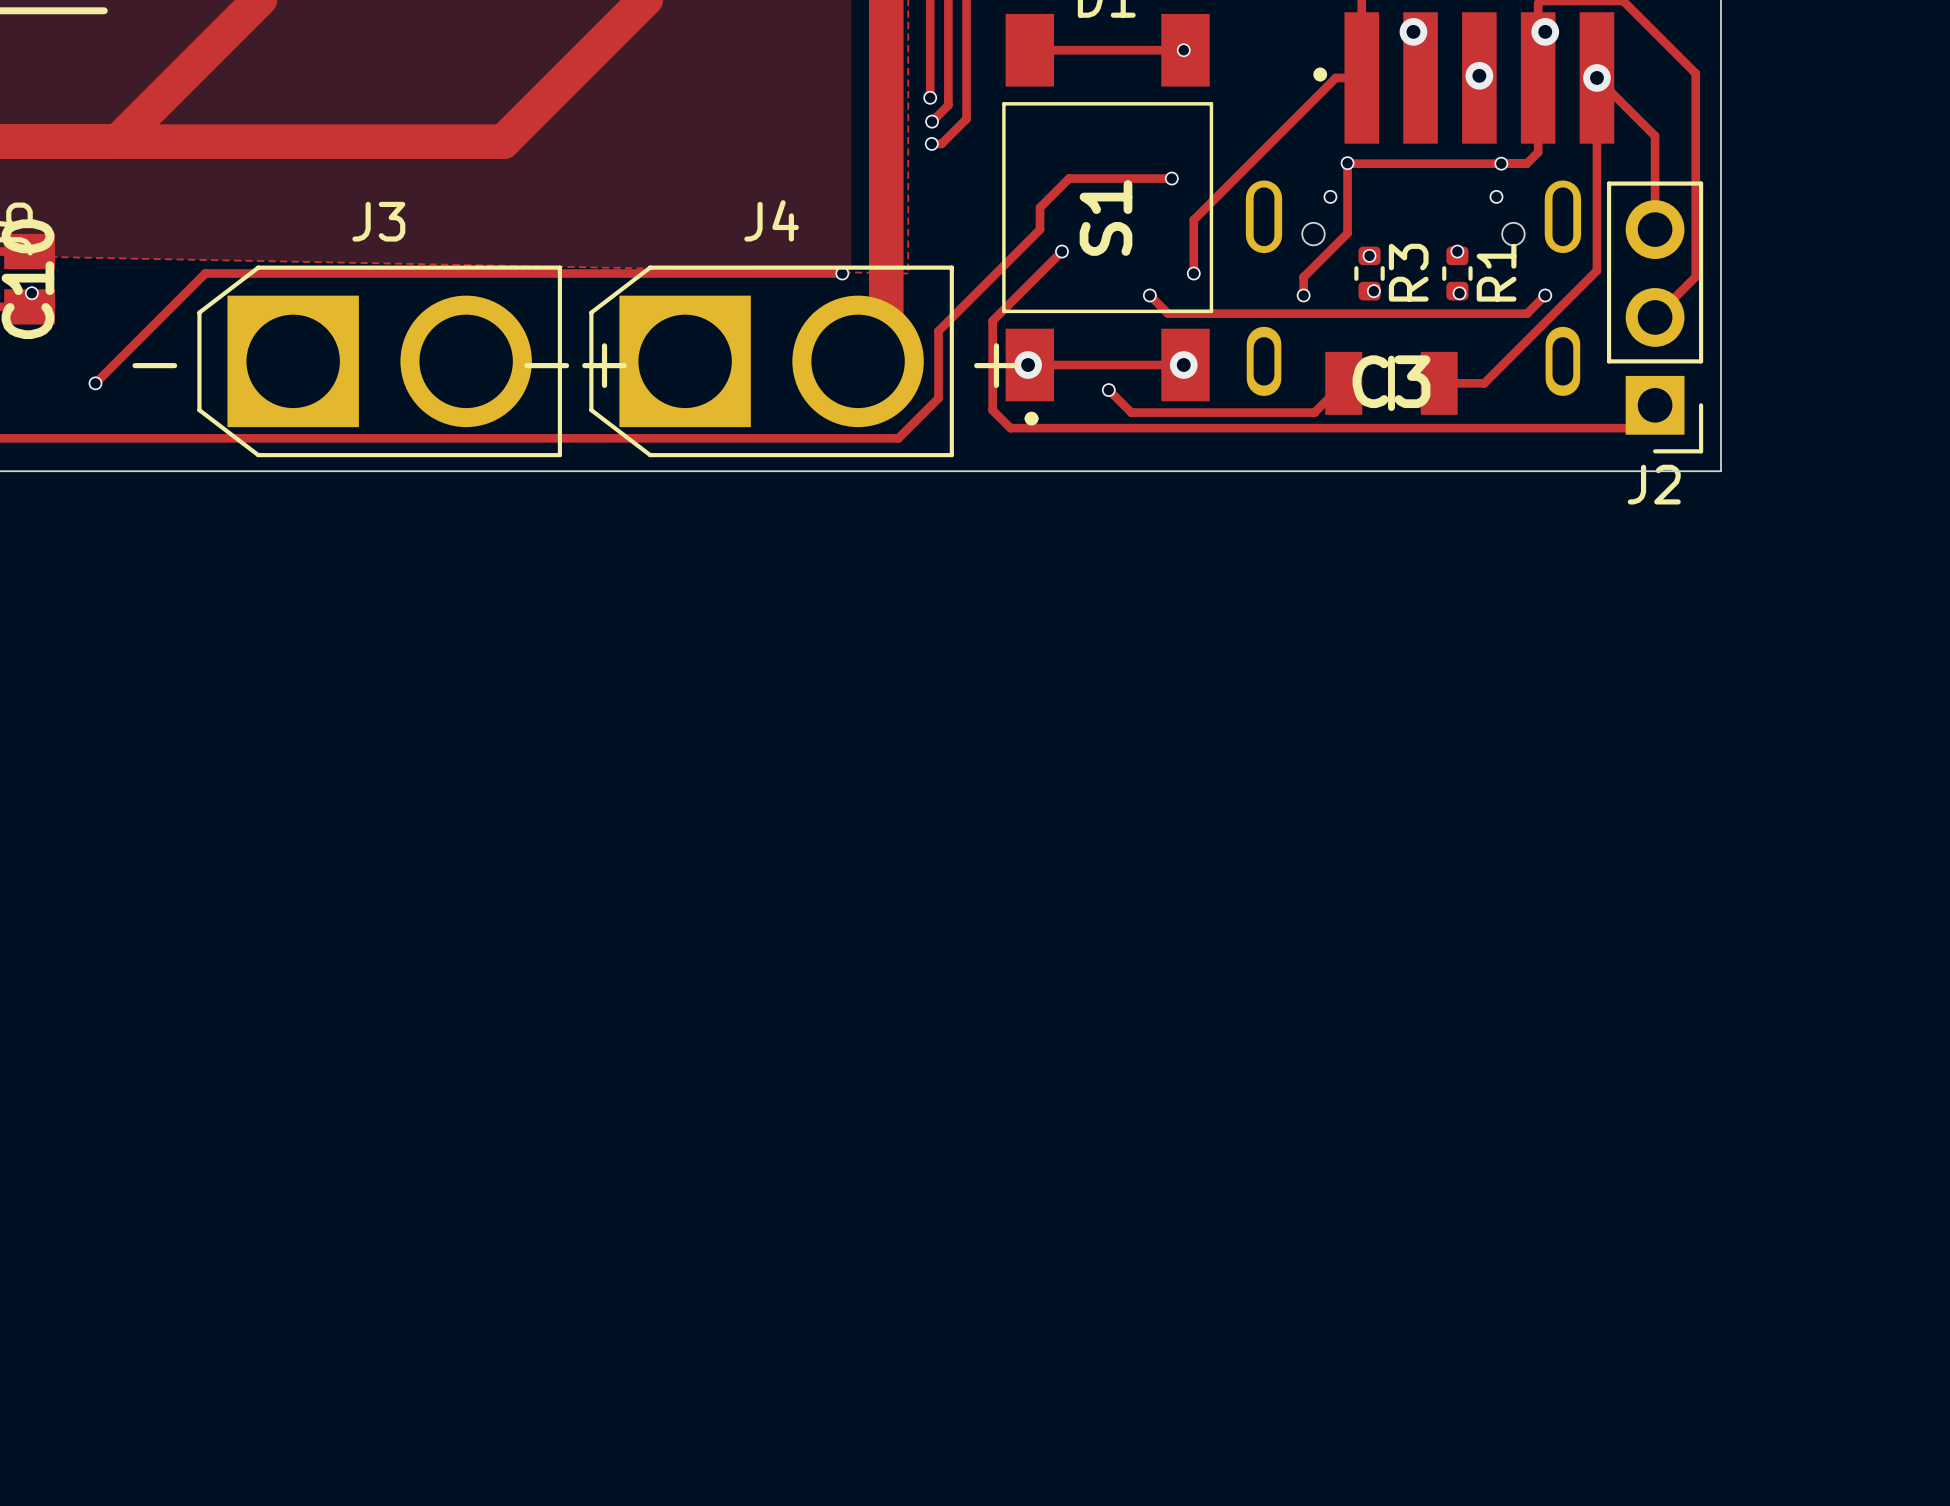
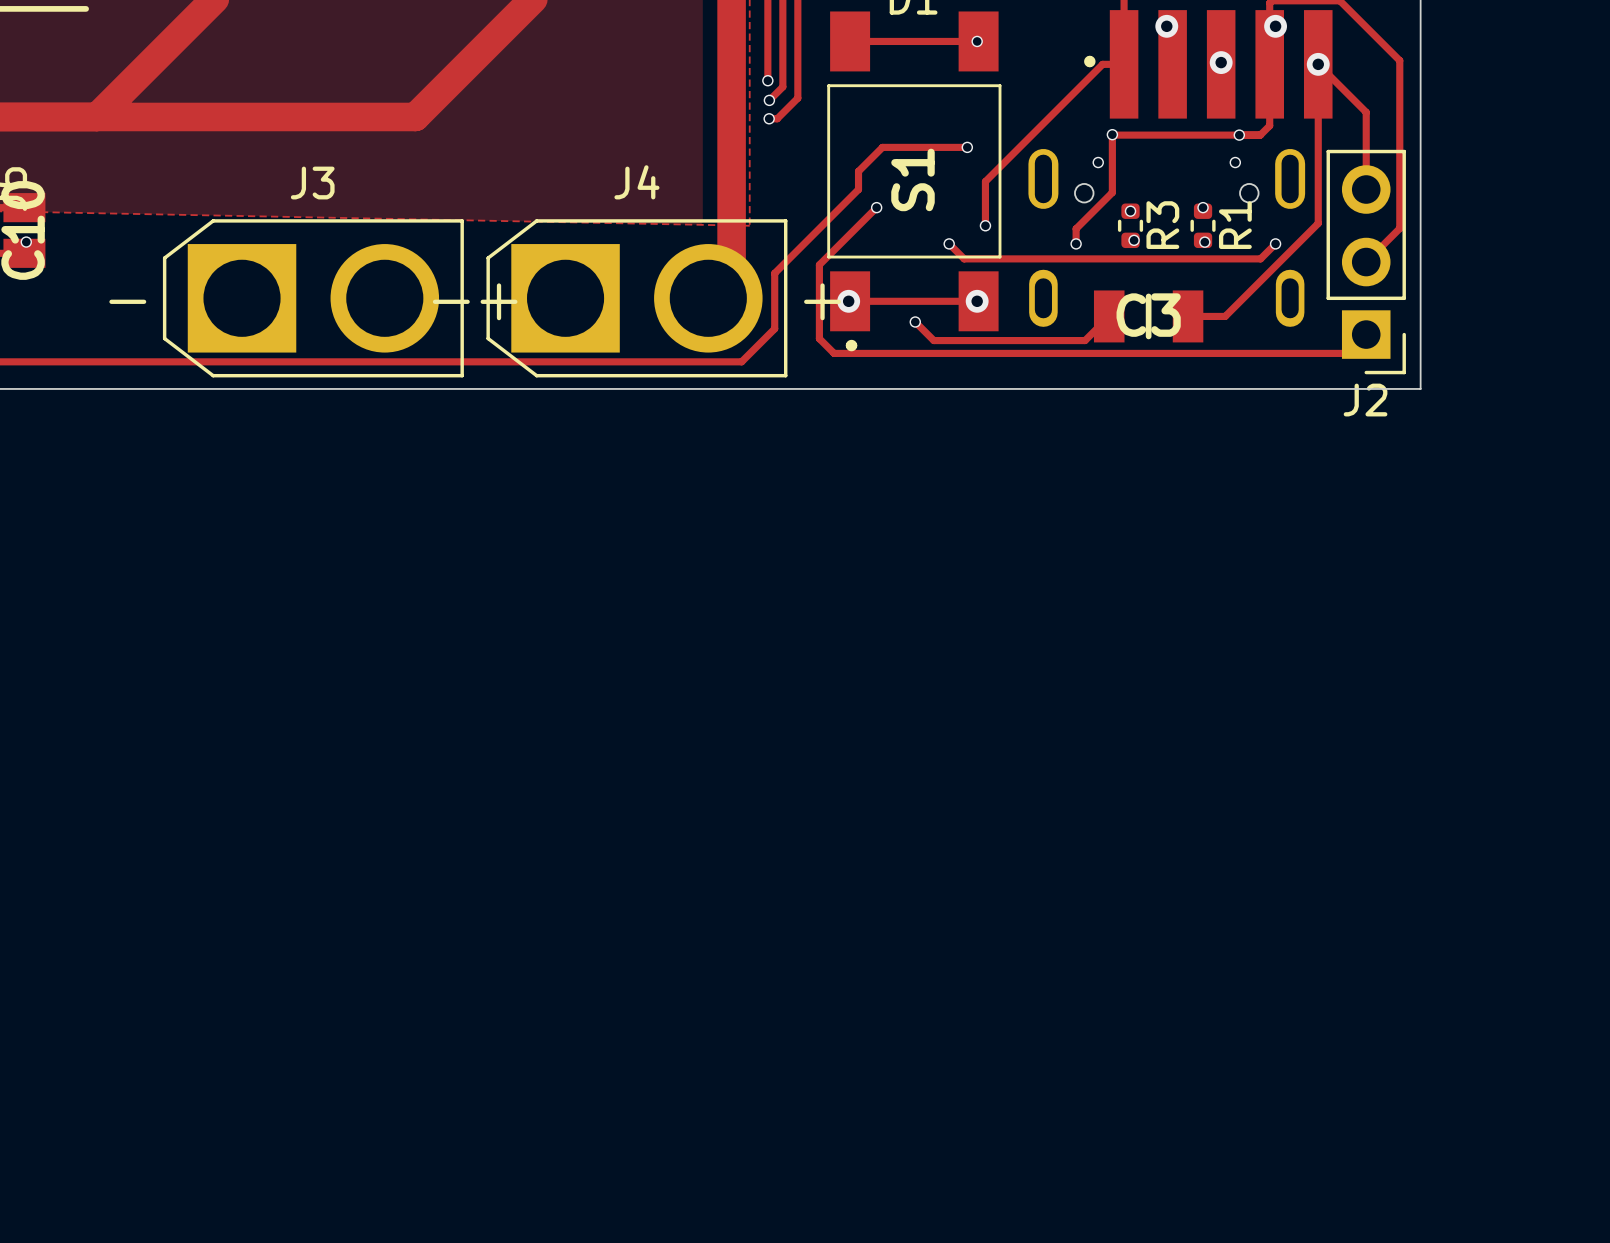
track: (842, 273) (205, 273) (95, 383) -> none
via: (842, 273) -> none
via: (95, 383) -> none

